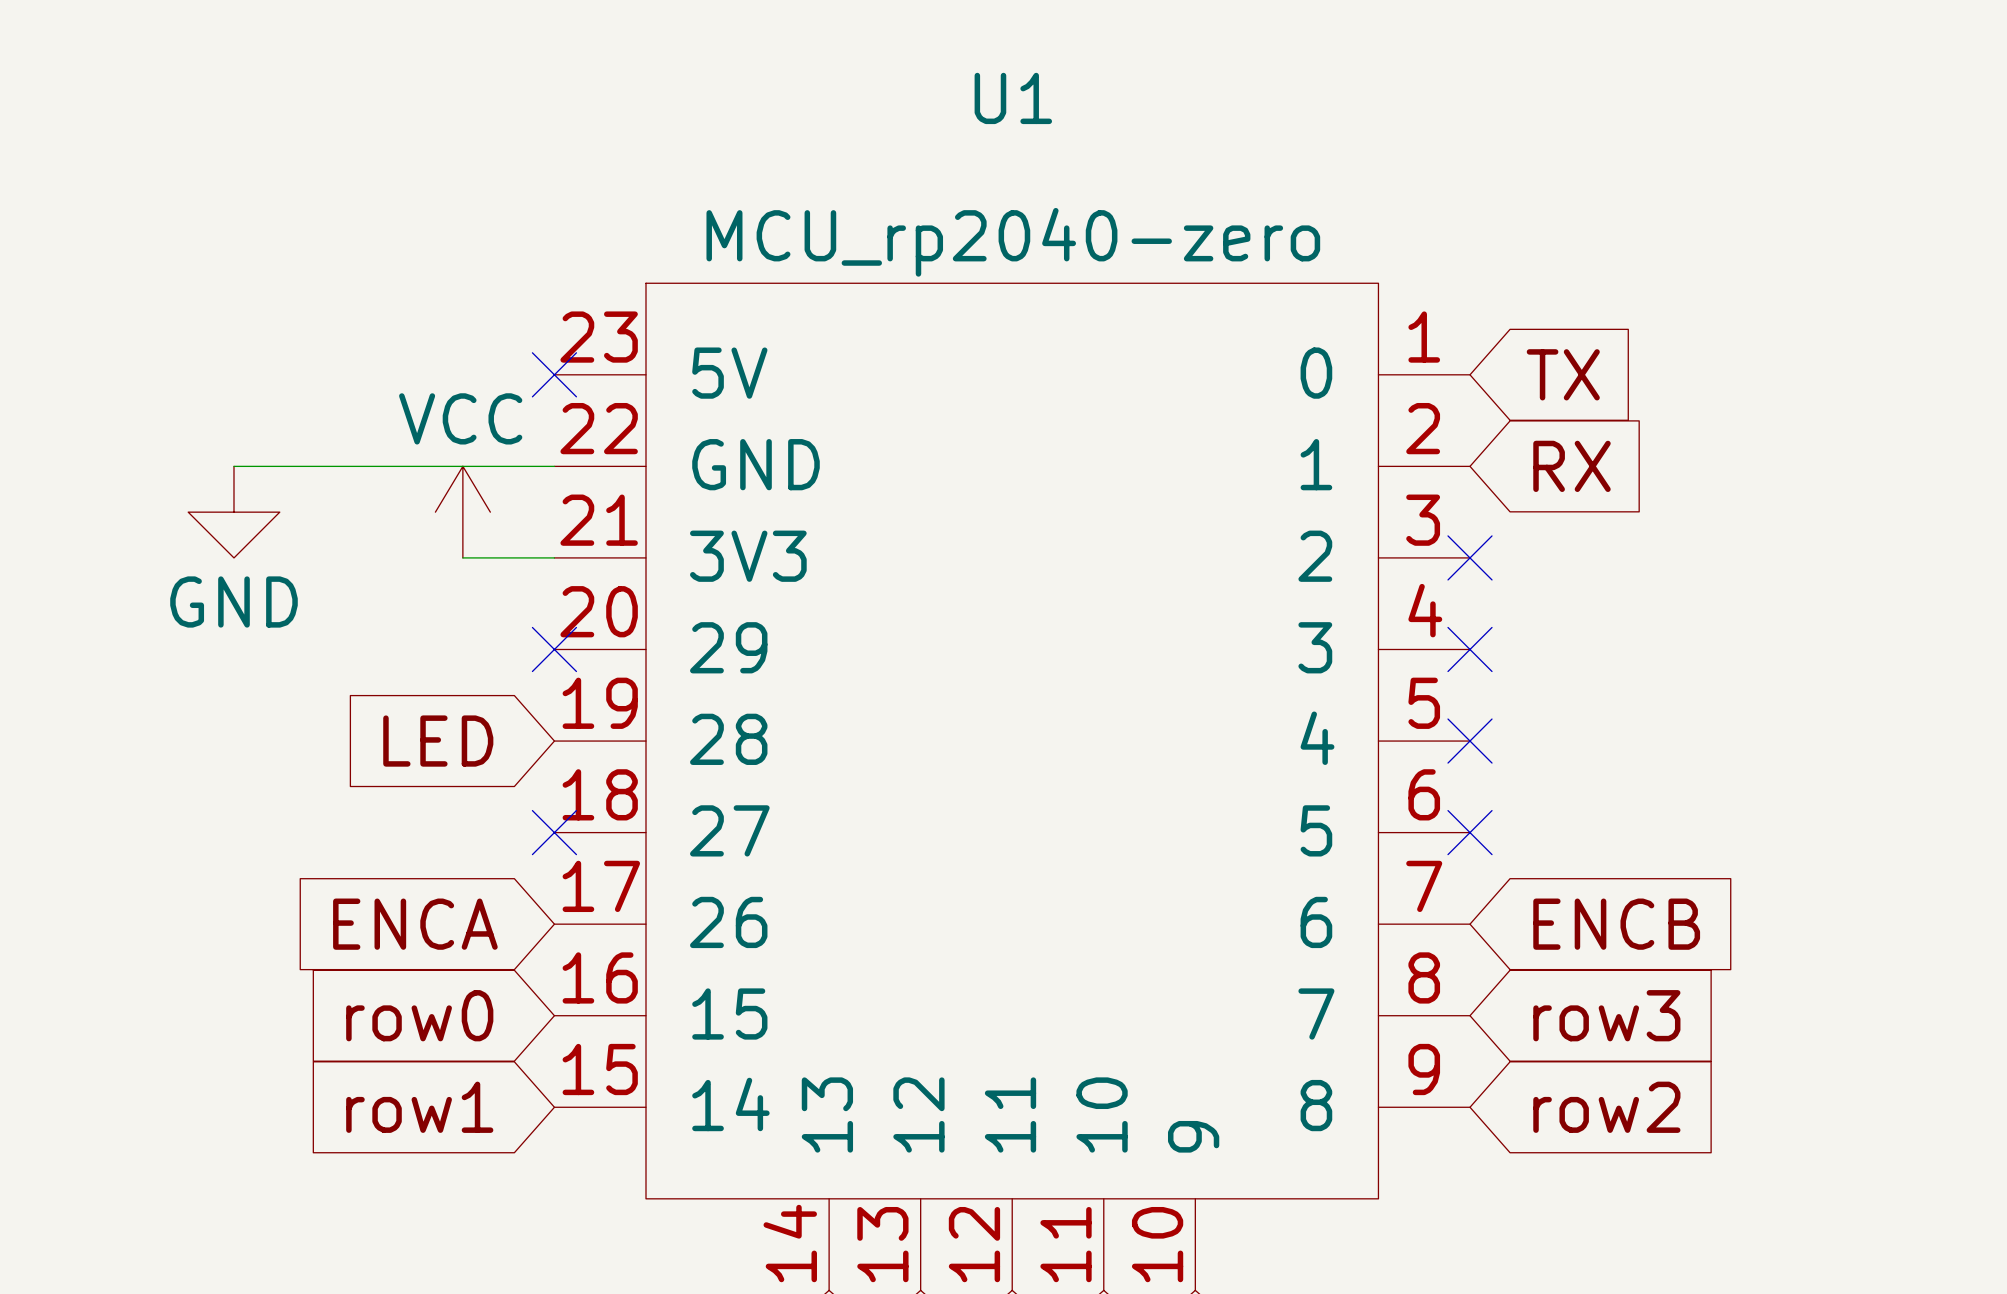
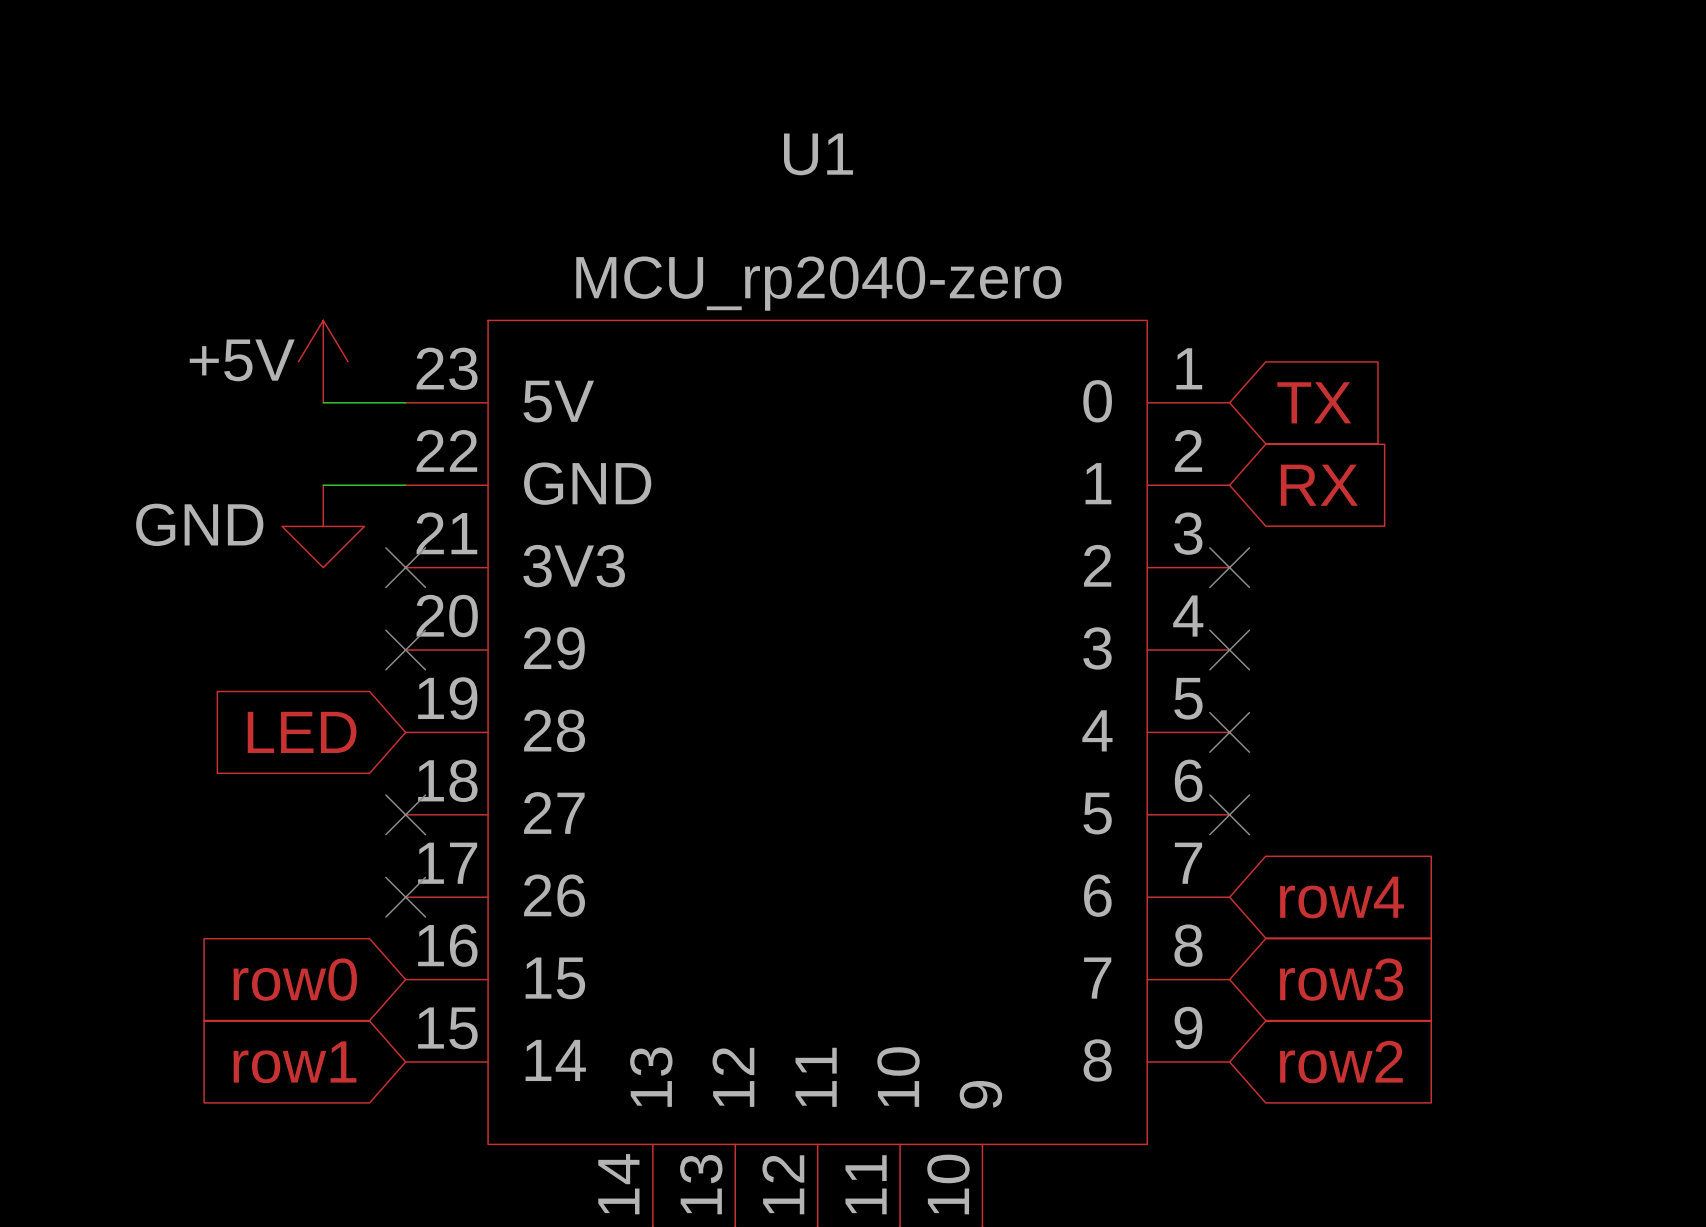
power symbol: none -> +5V (323, 361)
no-connect mark position: (554, 374) -> (405, 567)
wire: (233, 466) (462, 466) -> none
power symbol: GND (233, 512) -> none
power symbol: VCC (462, 512) -> GND (323, 526)
wire: (462, 557) (554, 557) -> (323, 402) (405, 402)
global label: ENCA (415, 924) -> none
no-connect mark: none -> (405, 897)
global label: ENCB (1616, 924) -> row4 (1342, 897)

